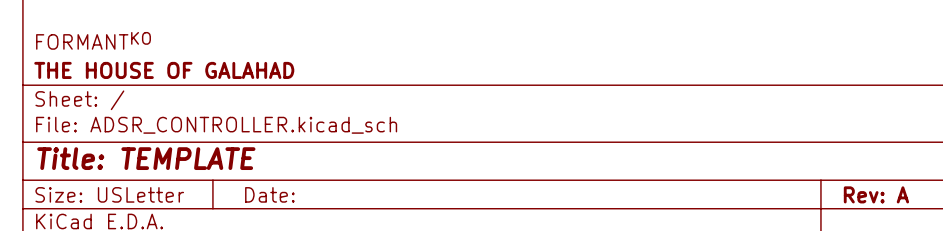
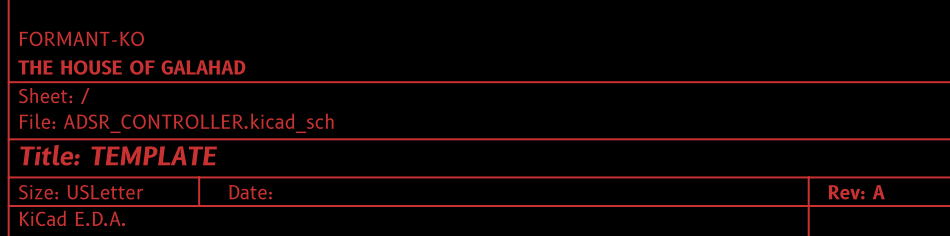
title block: FORMANTKO (93, 40) -> FORMANT-KO (81, 38)

